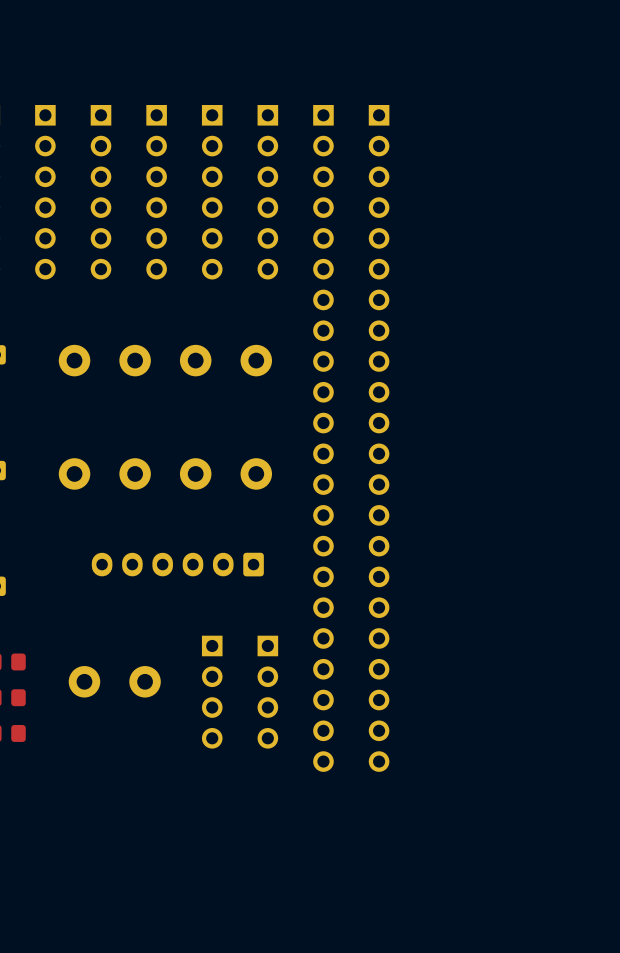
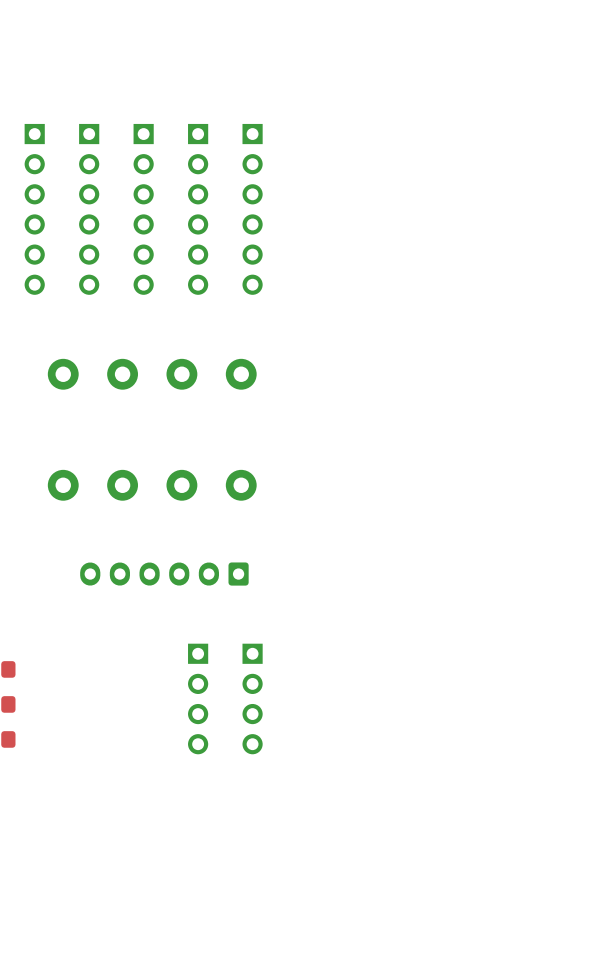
part: (323, 438) -> none
part: (379, 438) -> none
part: (114, 681) -> none

